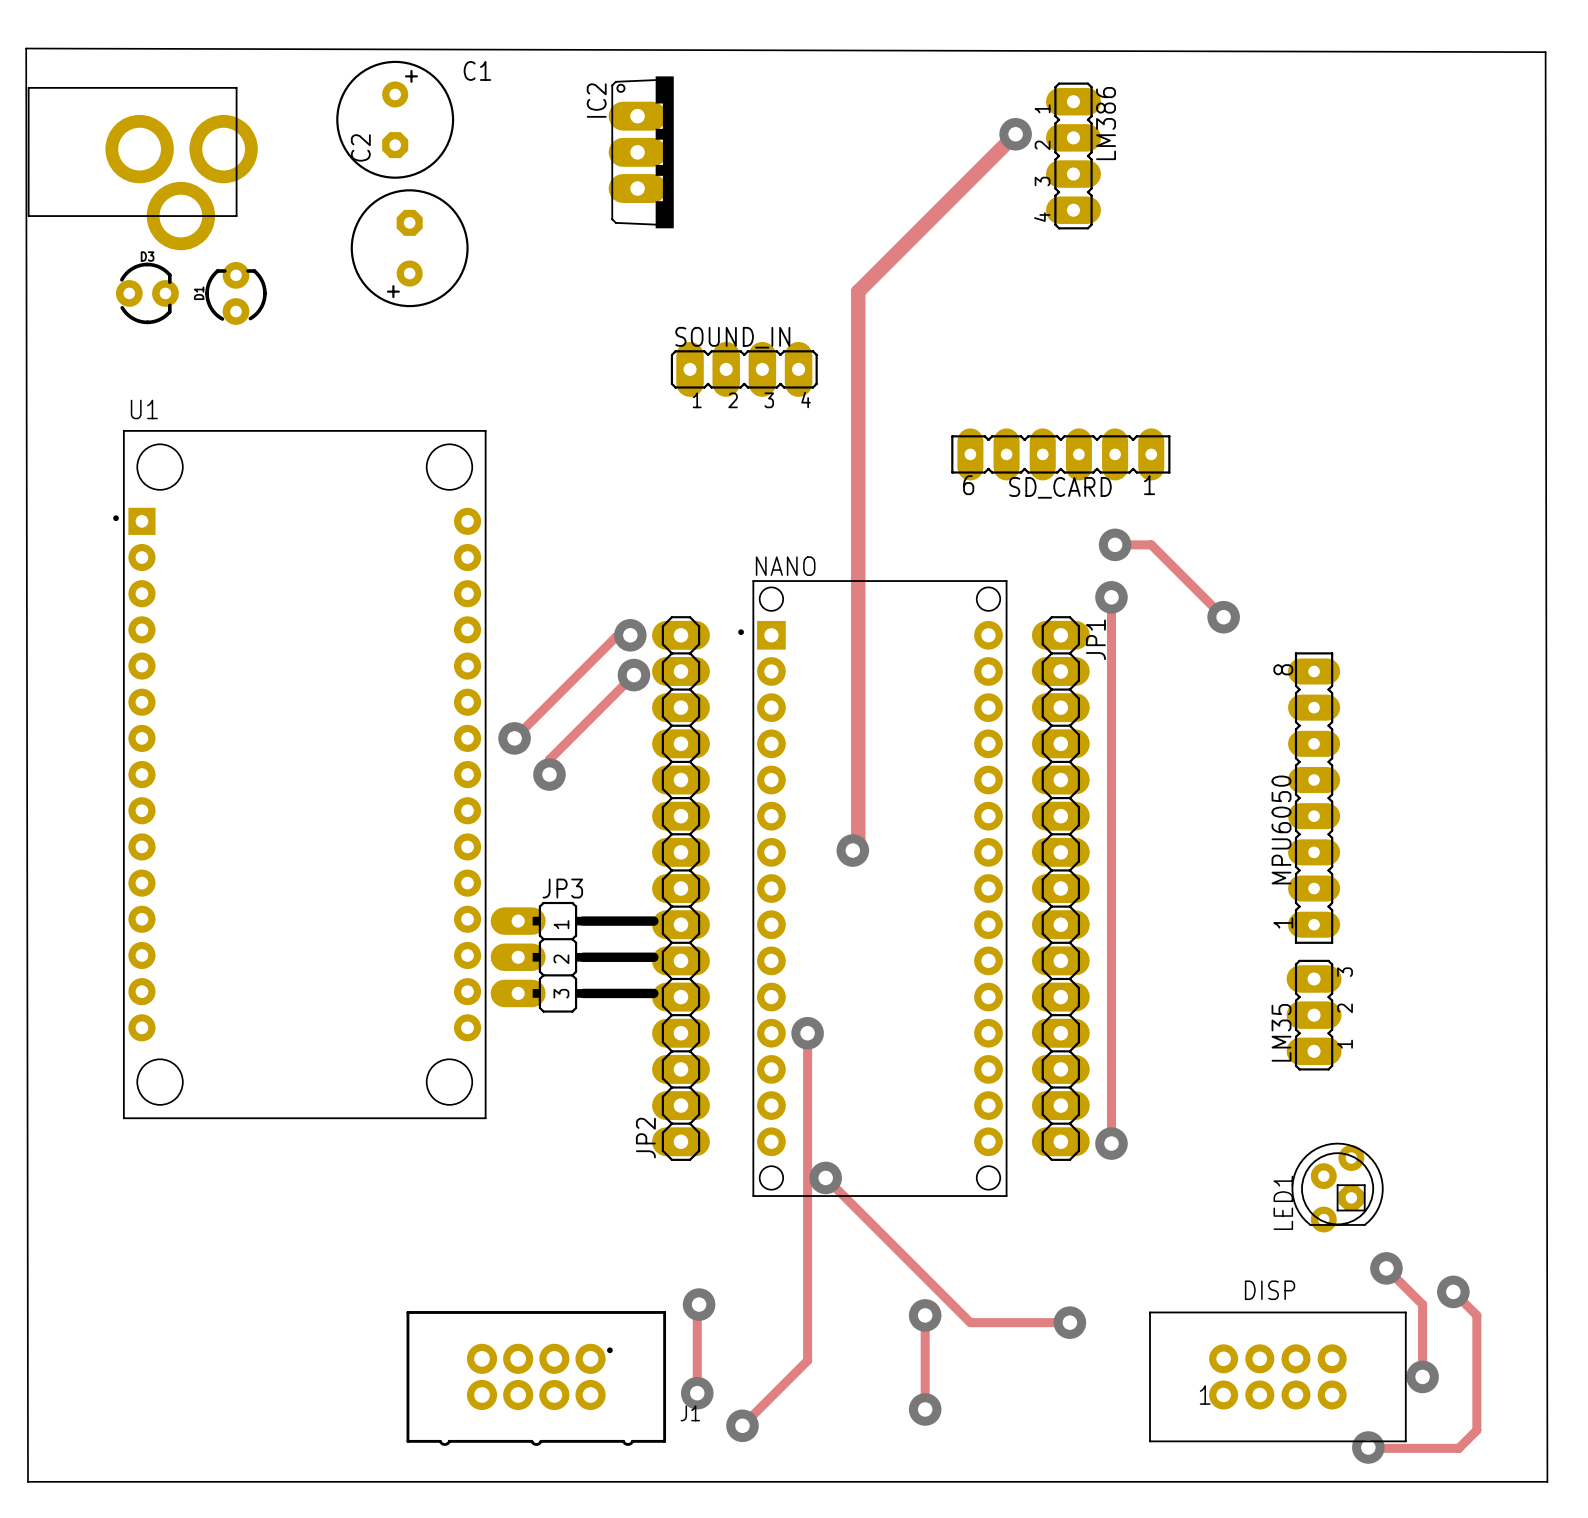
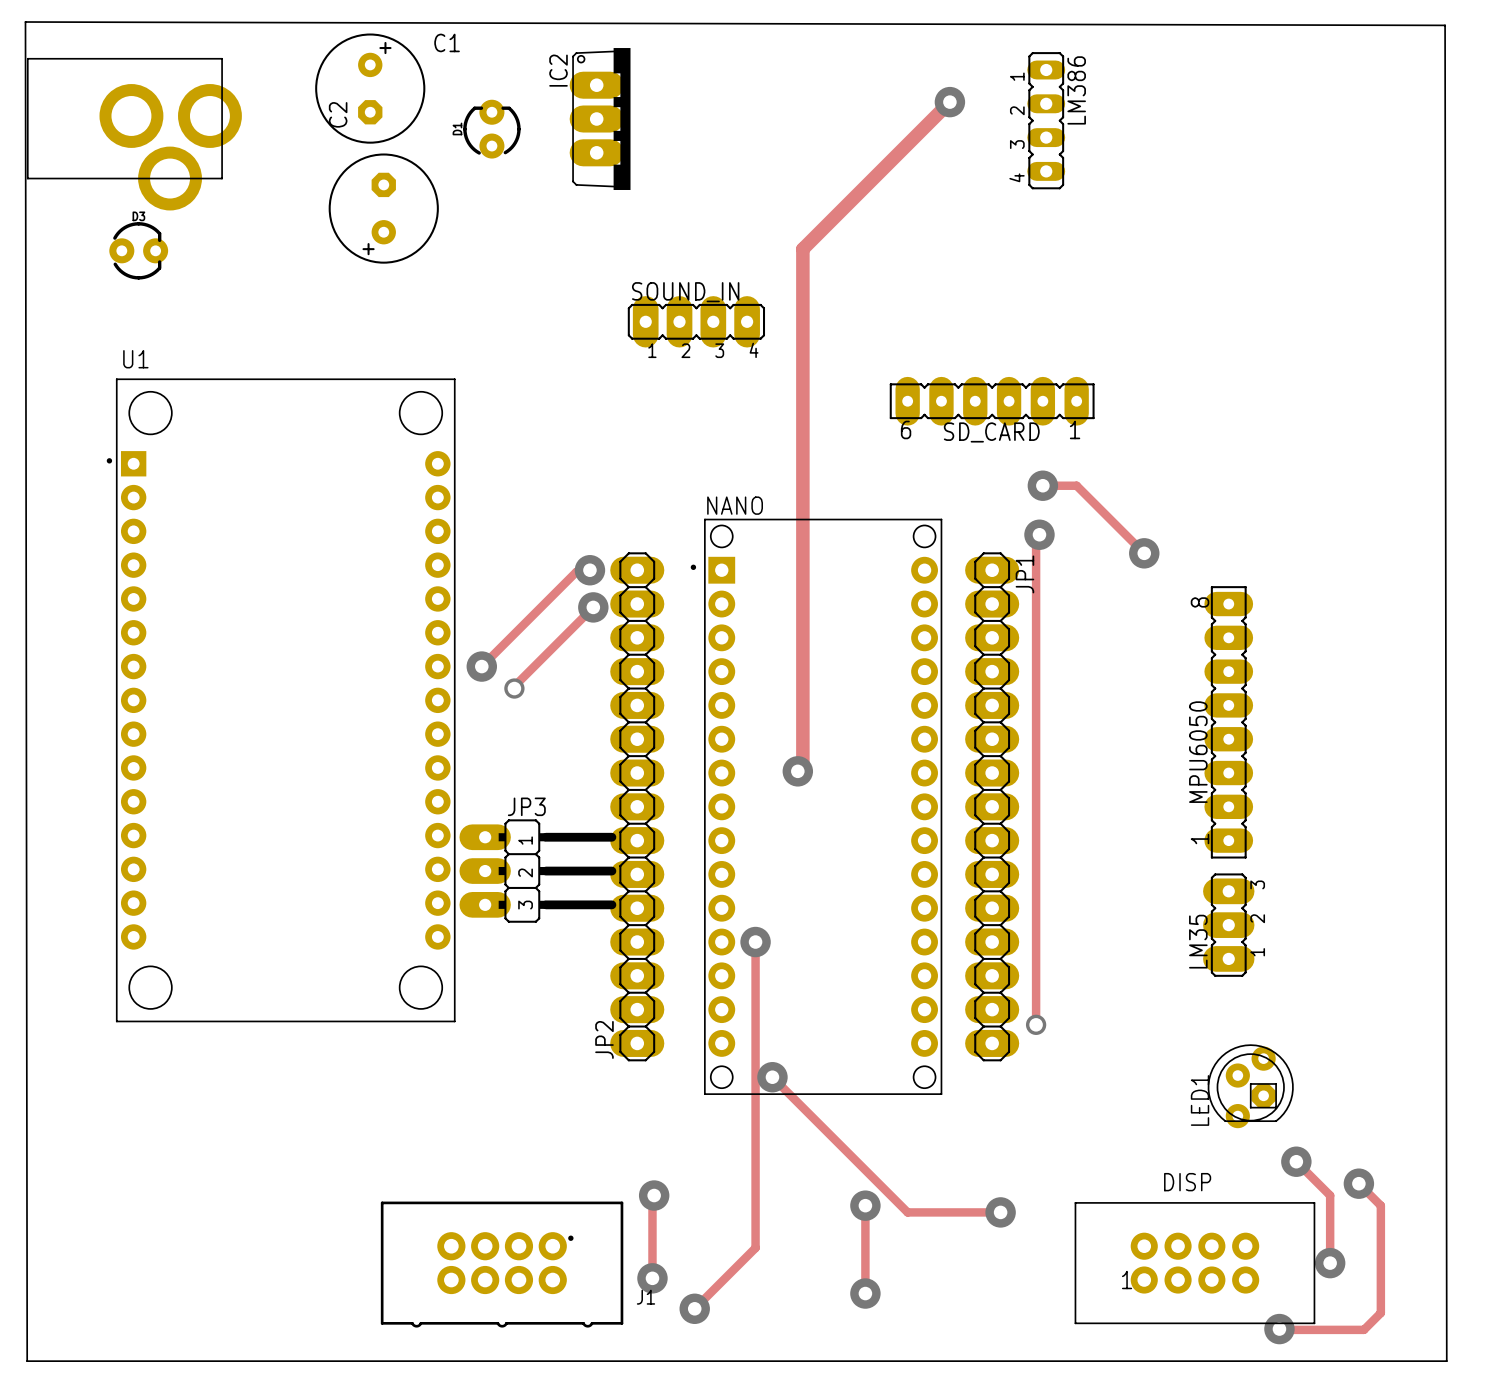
LM386 footprint: [1046, 82, 1101, 230] -> [1027, 52, 1066, 190]
D1 position: (236, 293) -> (491, 129)
track: (1111, 597) (1111, 1143) -> (1039, 534) (1036, 538) (1036, 1024)
via size: [533, 758, 566, 791] -> [504, 678, 525, 699]
via: none -> (1036, 1024)
via: (1111, 1143) -> none

